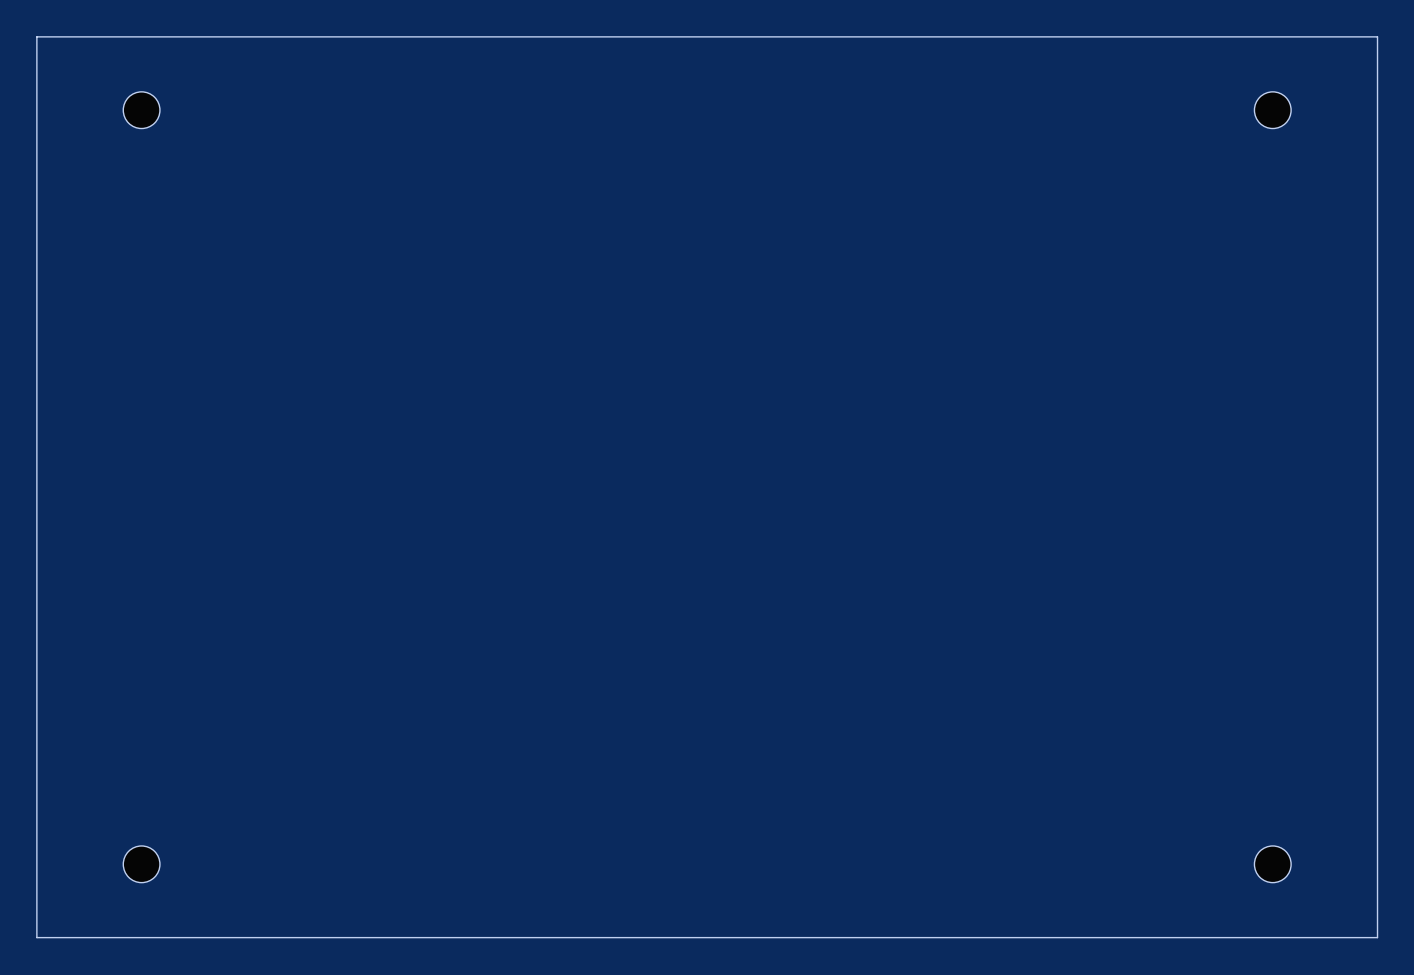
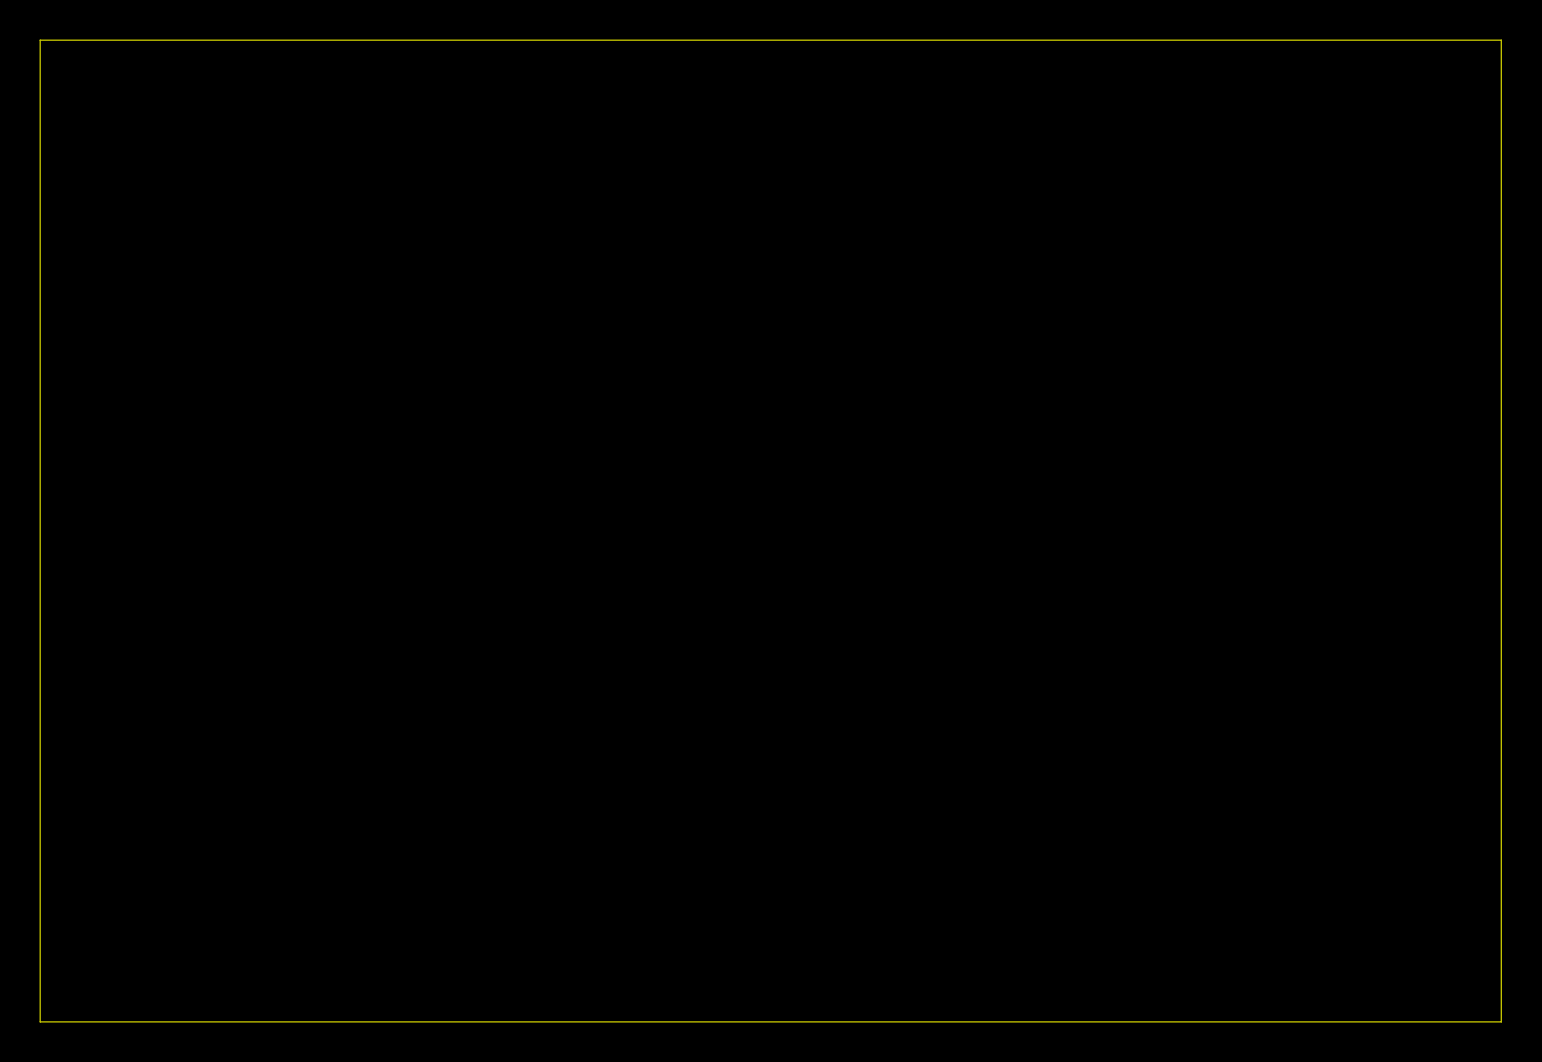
part: (141, 110) -> none
part: (1272, 110) -> none
part: (141, 864) -> none
part: (1272, 864) -> none

